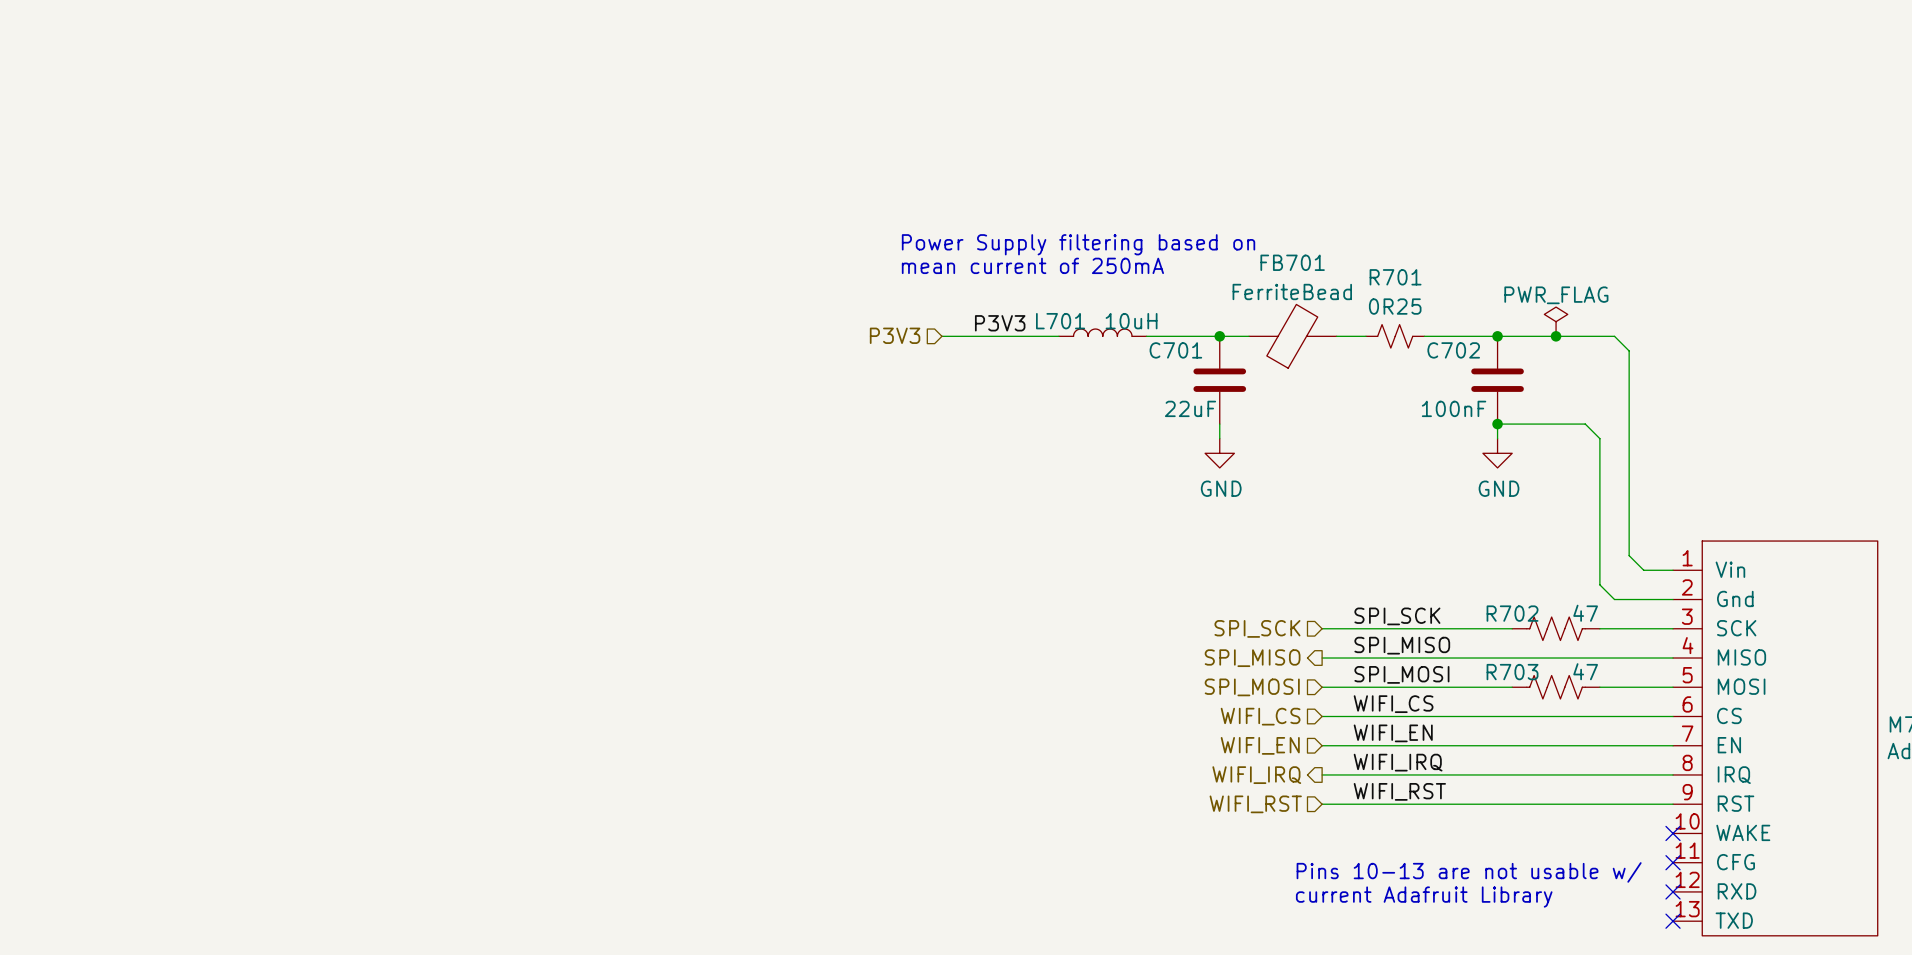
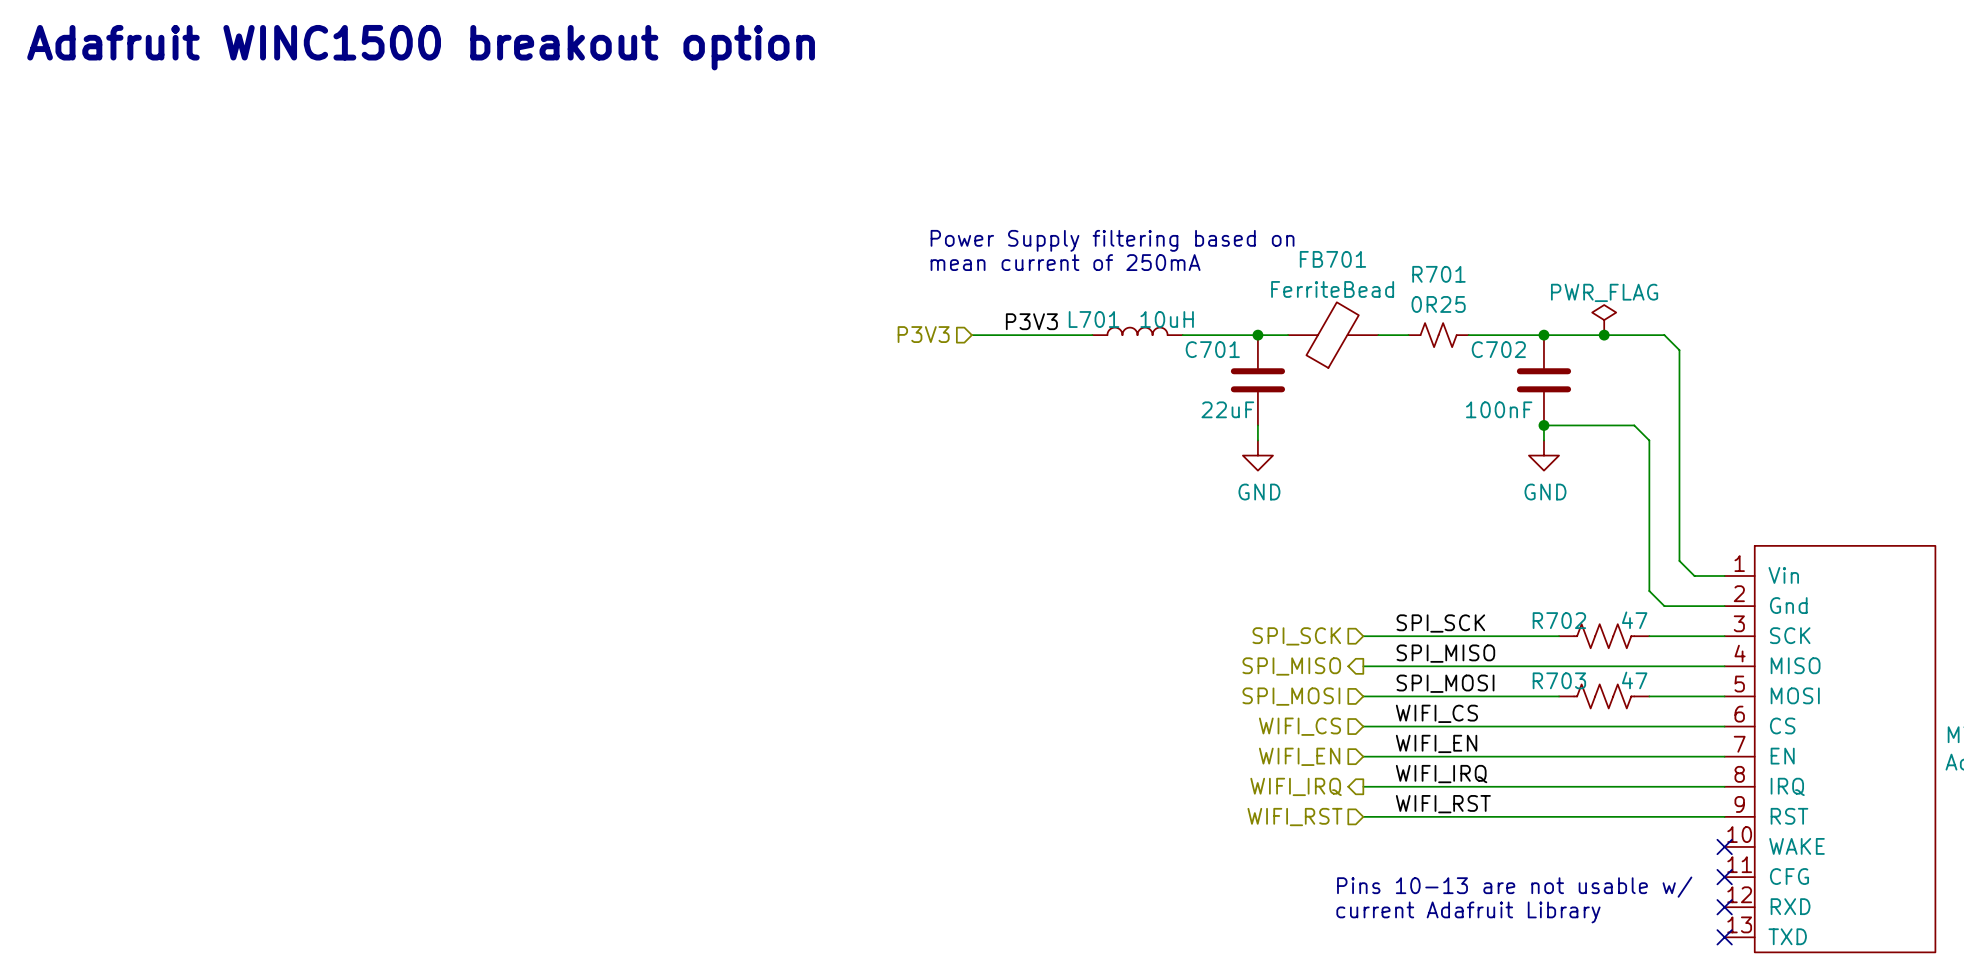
text: none -> Adafruit WINC1500 breakout option (421, 47)

